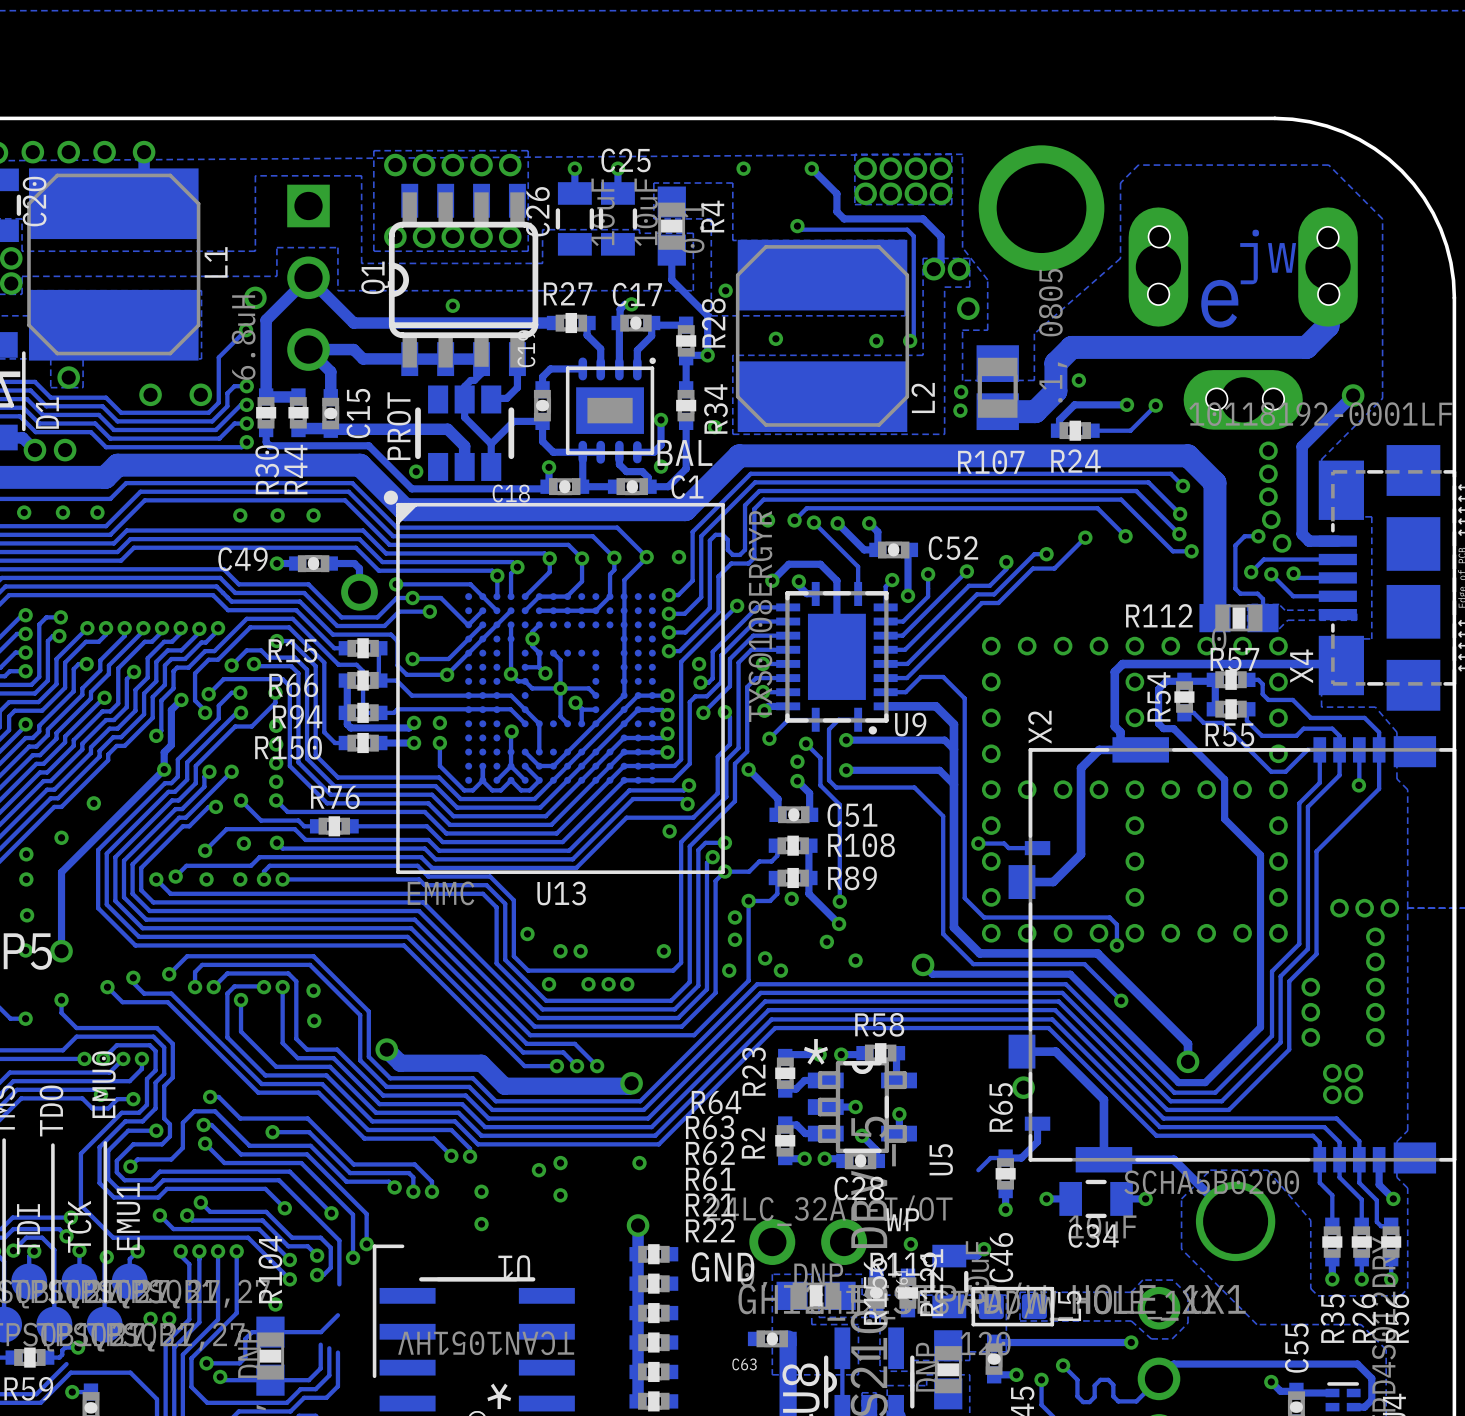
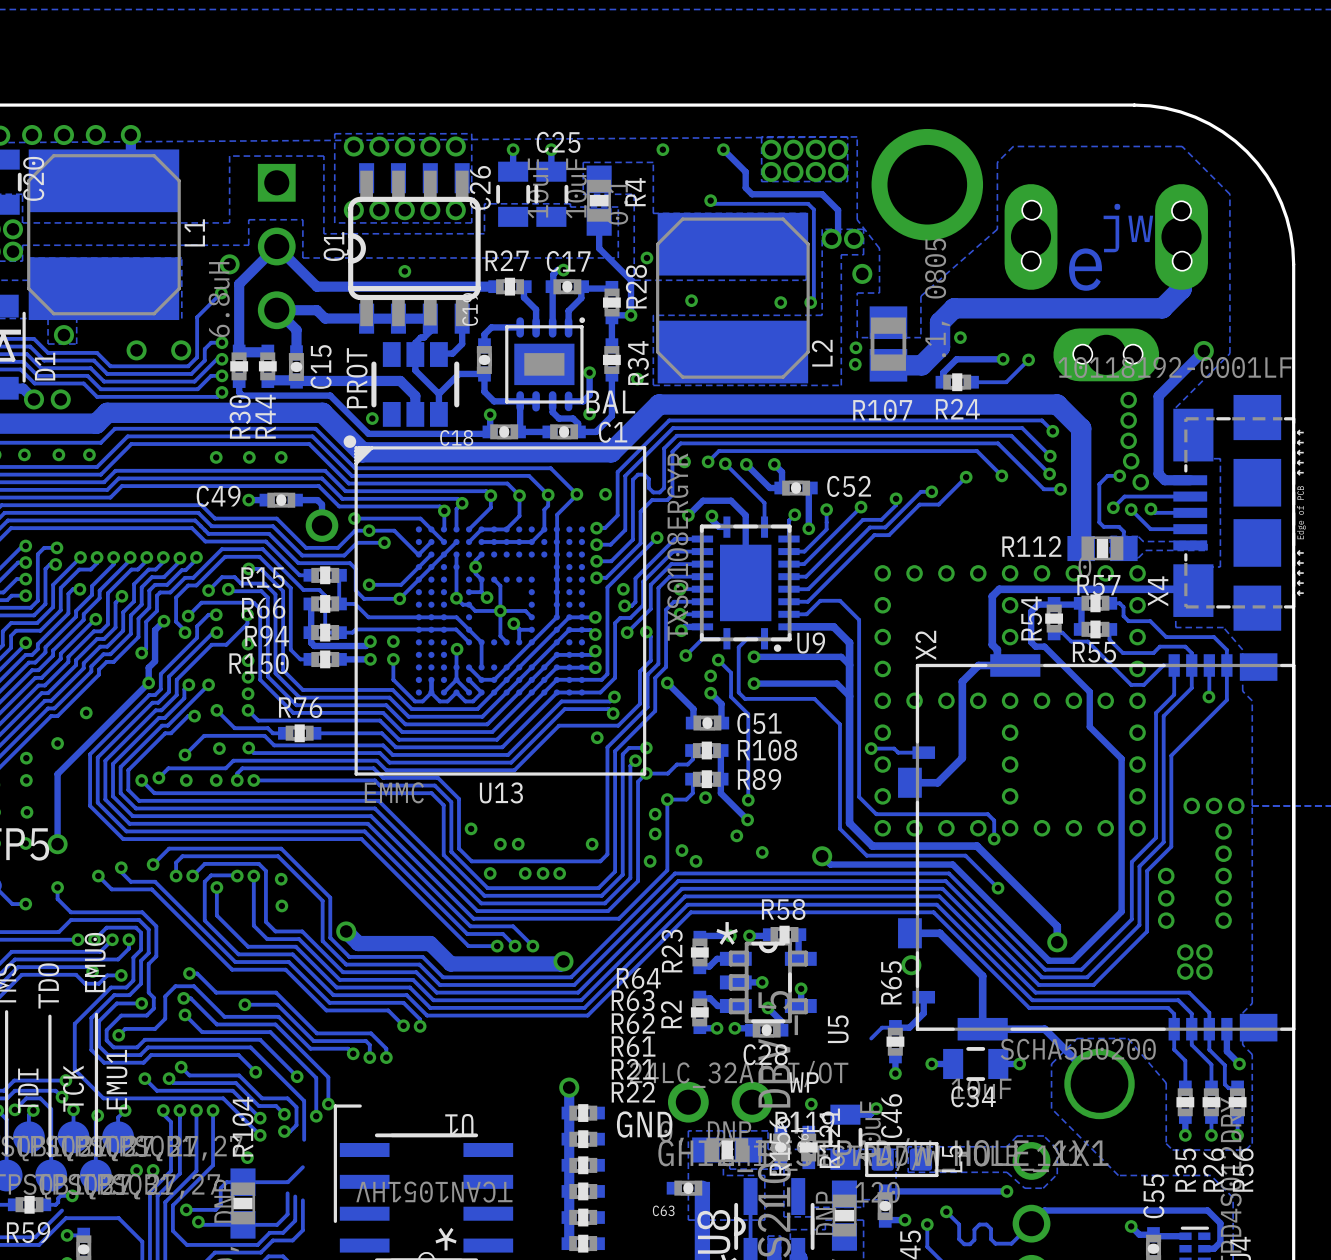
via: (560, 1163) -> none
via: (639, 1163) -> none
via: (538, 1170) -> none
via: (481, 1191) -> none
via: (560, 1195) -> none
via: (481, 1224) -> none

